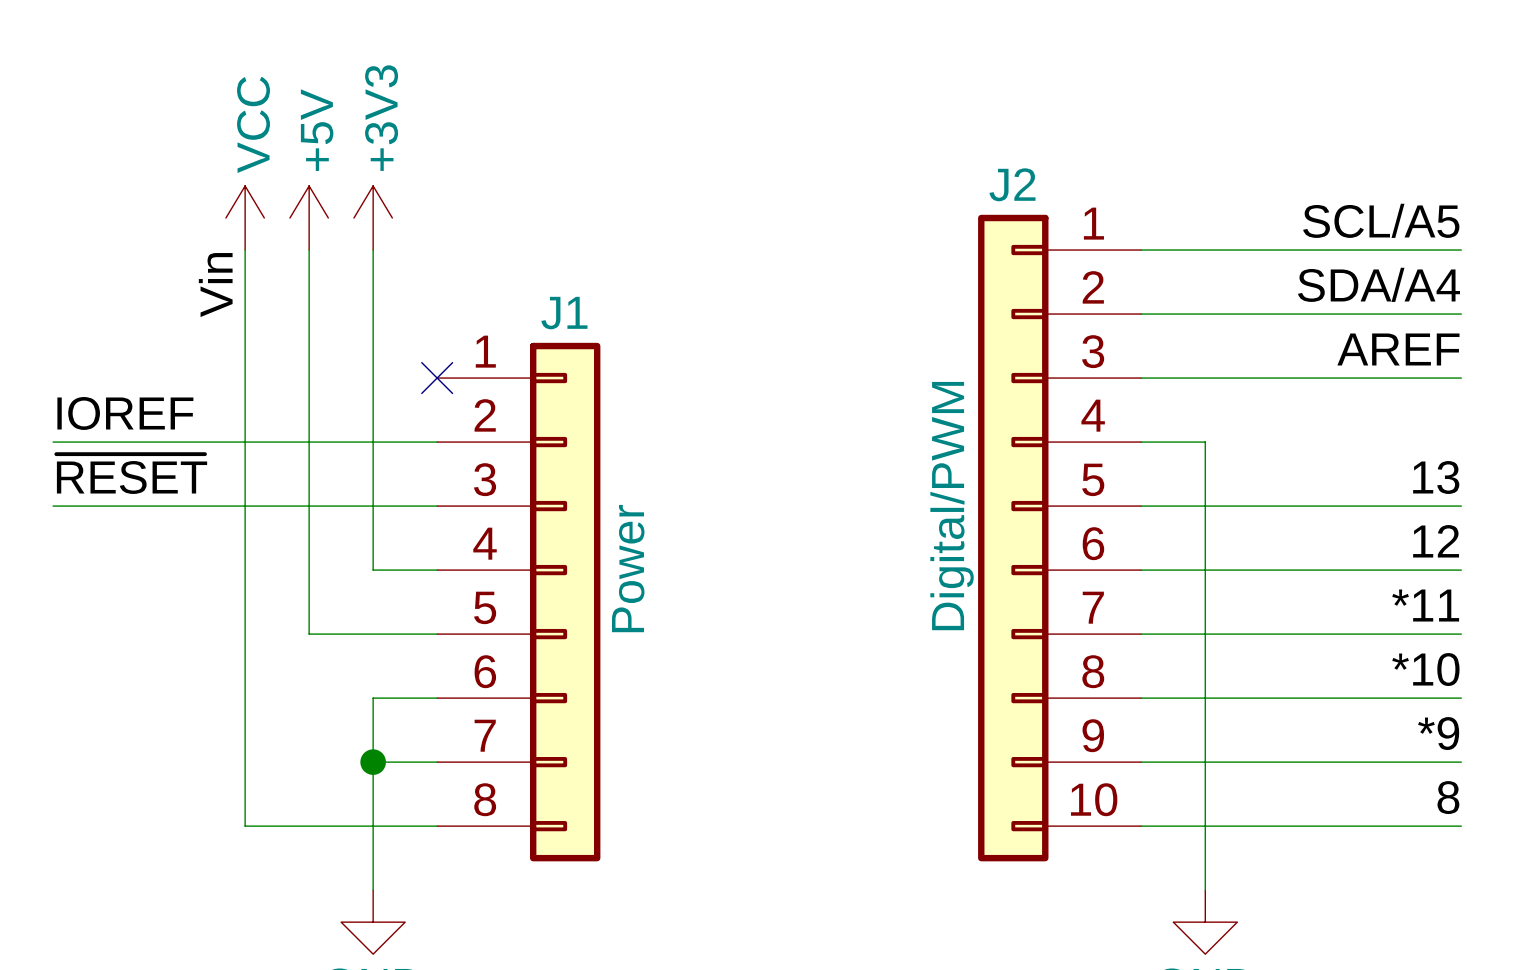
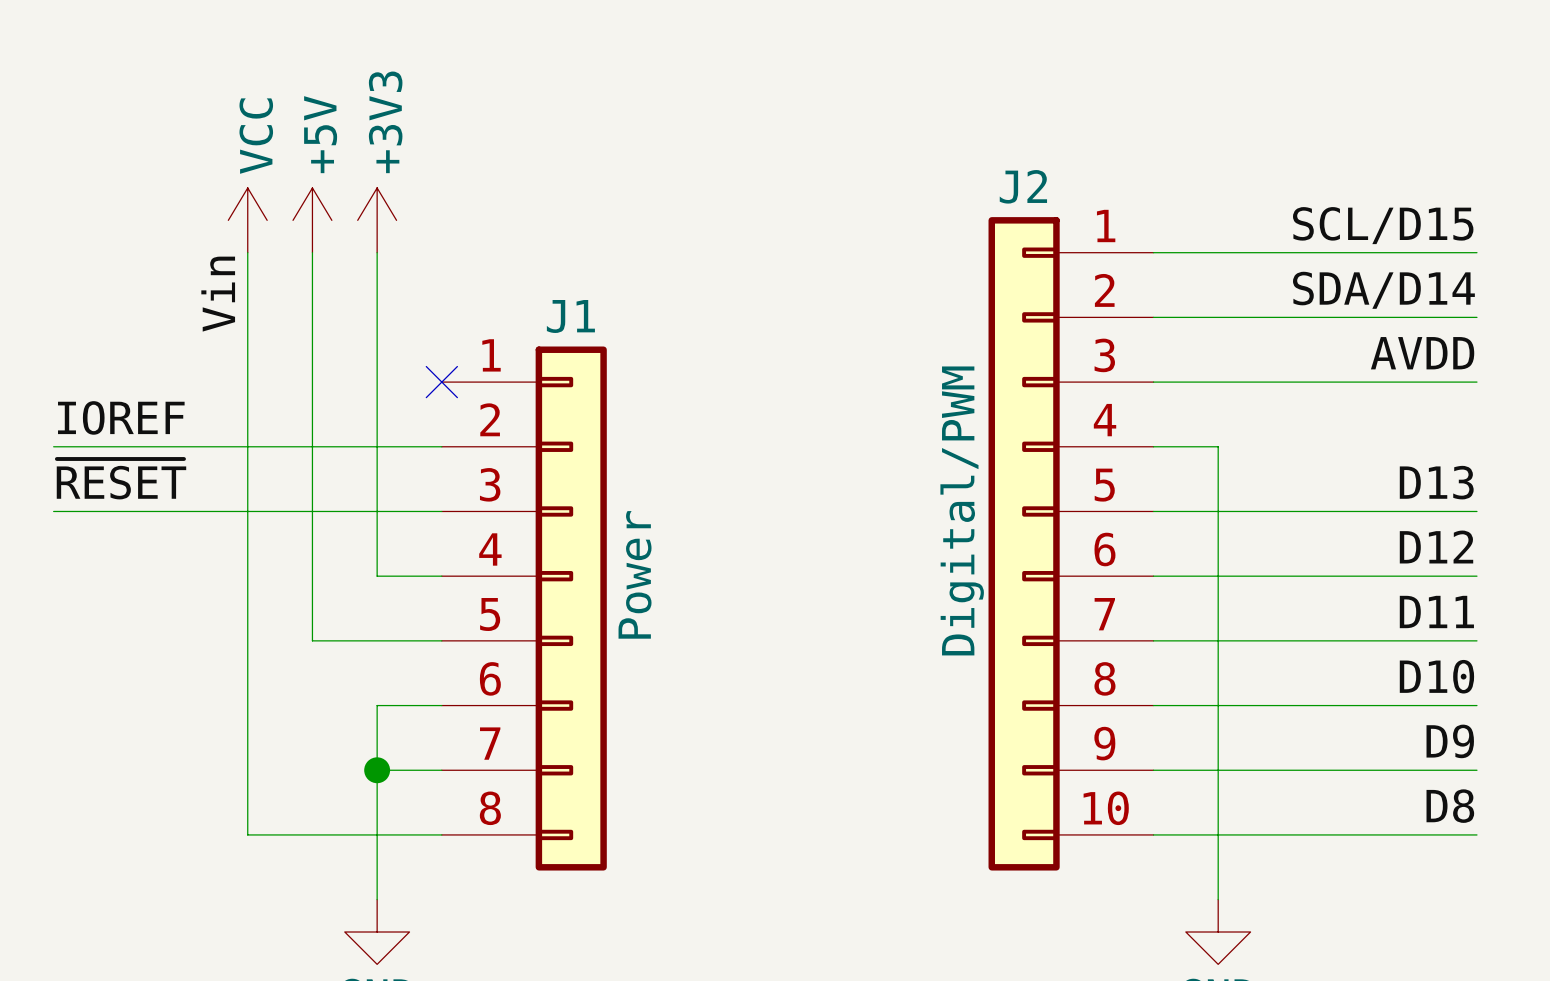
label: SCL/A5 (1381, 220) -> SCL/D15 (1383, 225)
label: SDA/A4 (1378, 284) -> SDA/D14 (1383, 290)
label: AREF (1398, 349) -> AVDD (1422, 353)
label: 13 (1436, 477) -> D13 (1436, 482)
label: 12 (1436, 541) -> D12 (1436, 547)
label: *11 (1425, 605) -> D11 (1436, 612)
label: *10 (1425, 669) -> D10 (1436, 676)
label: *9 (1438, 733) -> D9 (1450, 741)
label: 8 (1448, 797) -> D8 (1450, 806)

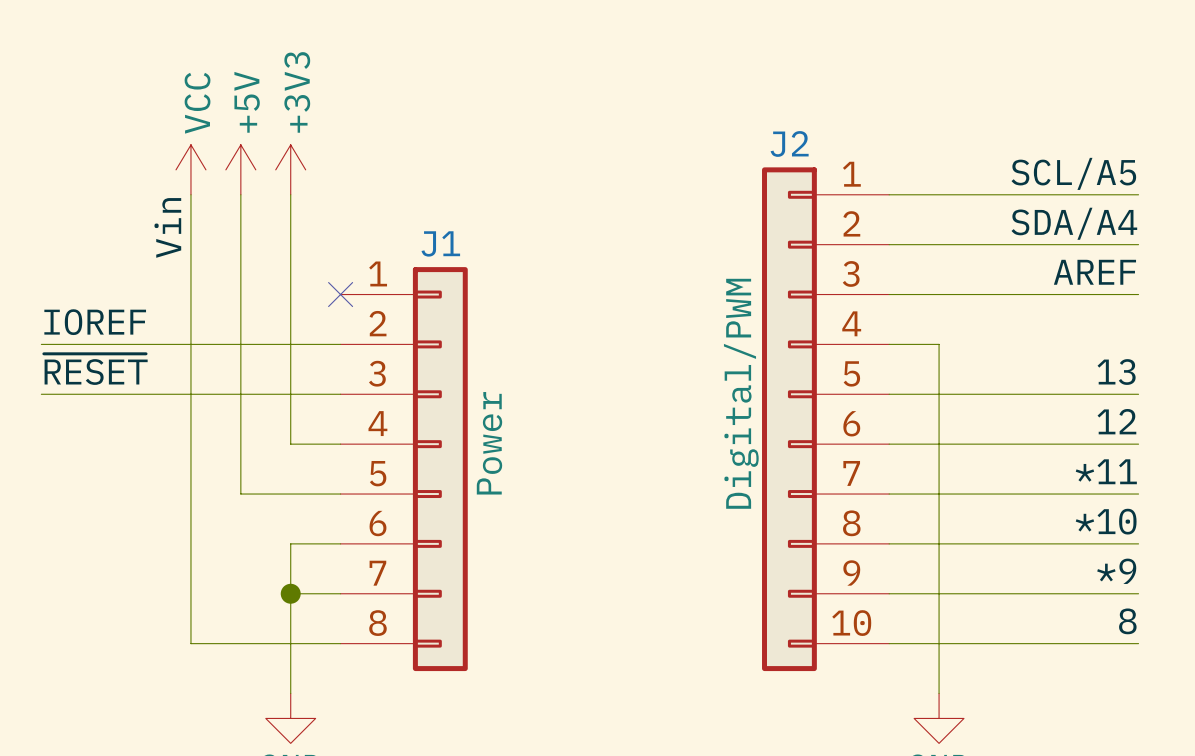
label: SCL/D15 (1383, 225) -> SCL/A5 (1073, 173)
label: SDA/D14 (1383, 290) -> SDA/A4 (1074, 223)
label: AVDD (1422, 353) -> AREF (1094, 272)
label: D13 (1436, 482) -> 13 (1116, 372)
label: D12 (1436, 547) -> 12 (1116, 421)
label: D11 (1436, 612) -> *11 (1106, 471)
label: D10 (1436, 676) -> *10 (1106, 521)
label: D9 (1450, 741) -> *9 (1116, 571)
label: D8 (1450, 806) -> 8 (1127, 621)

